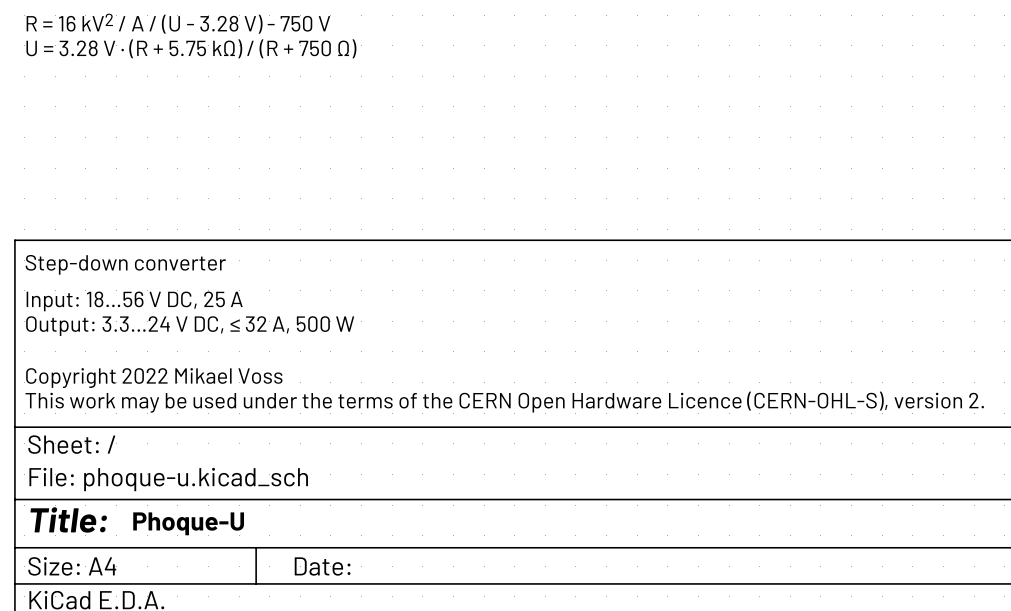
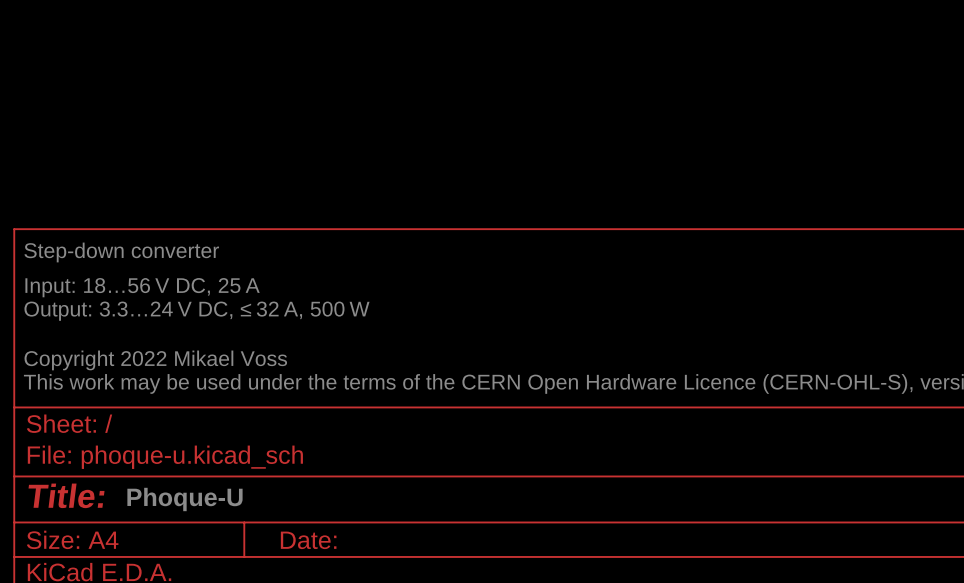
text: R = 16 kV2 / A / (U - 3.28 V) - 750 V (178, 23) -> none
text: U = 3.28 V · (R + 5.75 kΩ) / (R + 750 Ω) (191, 48) -> none

